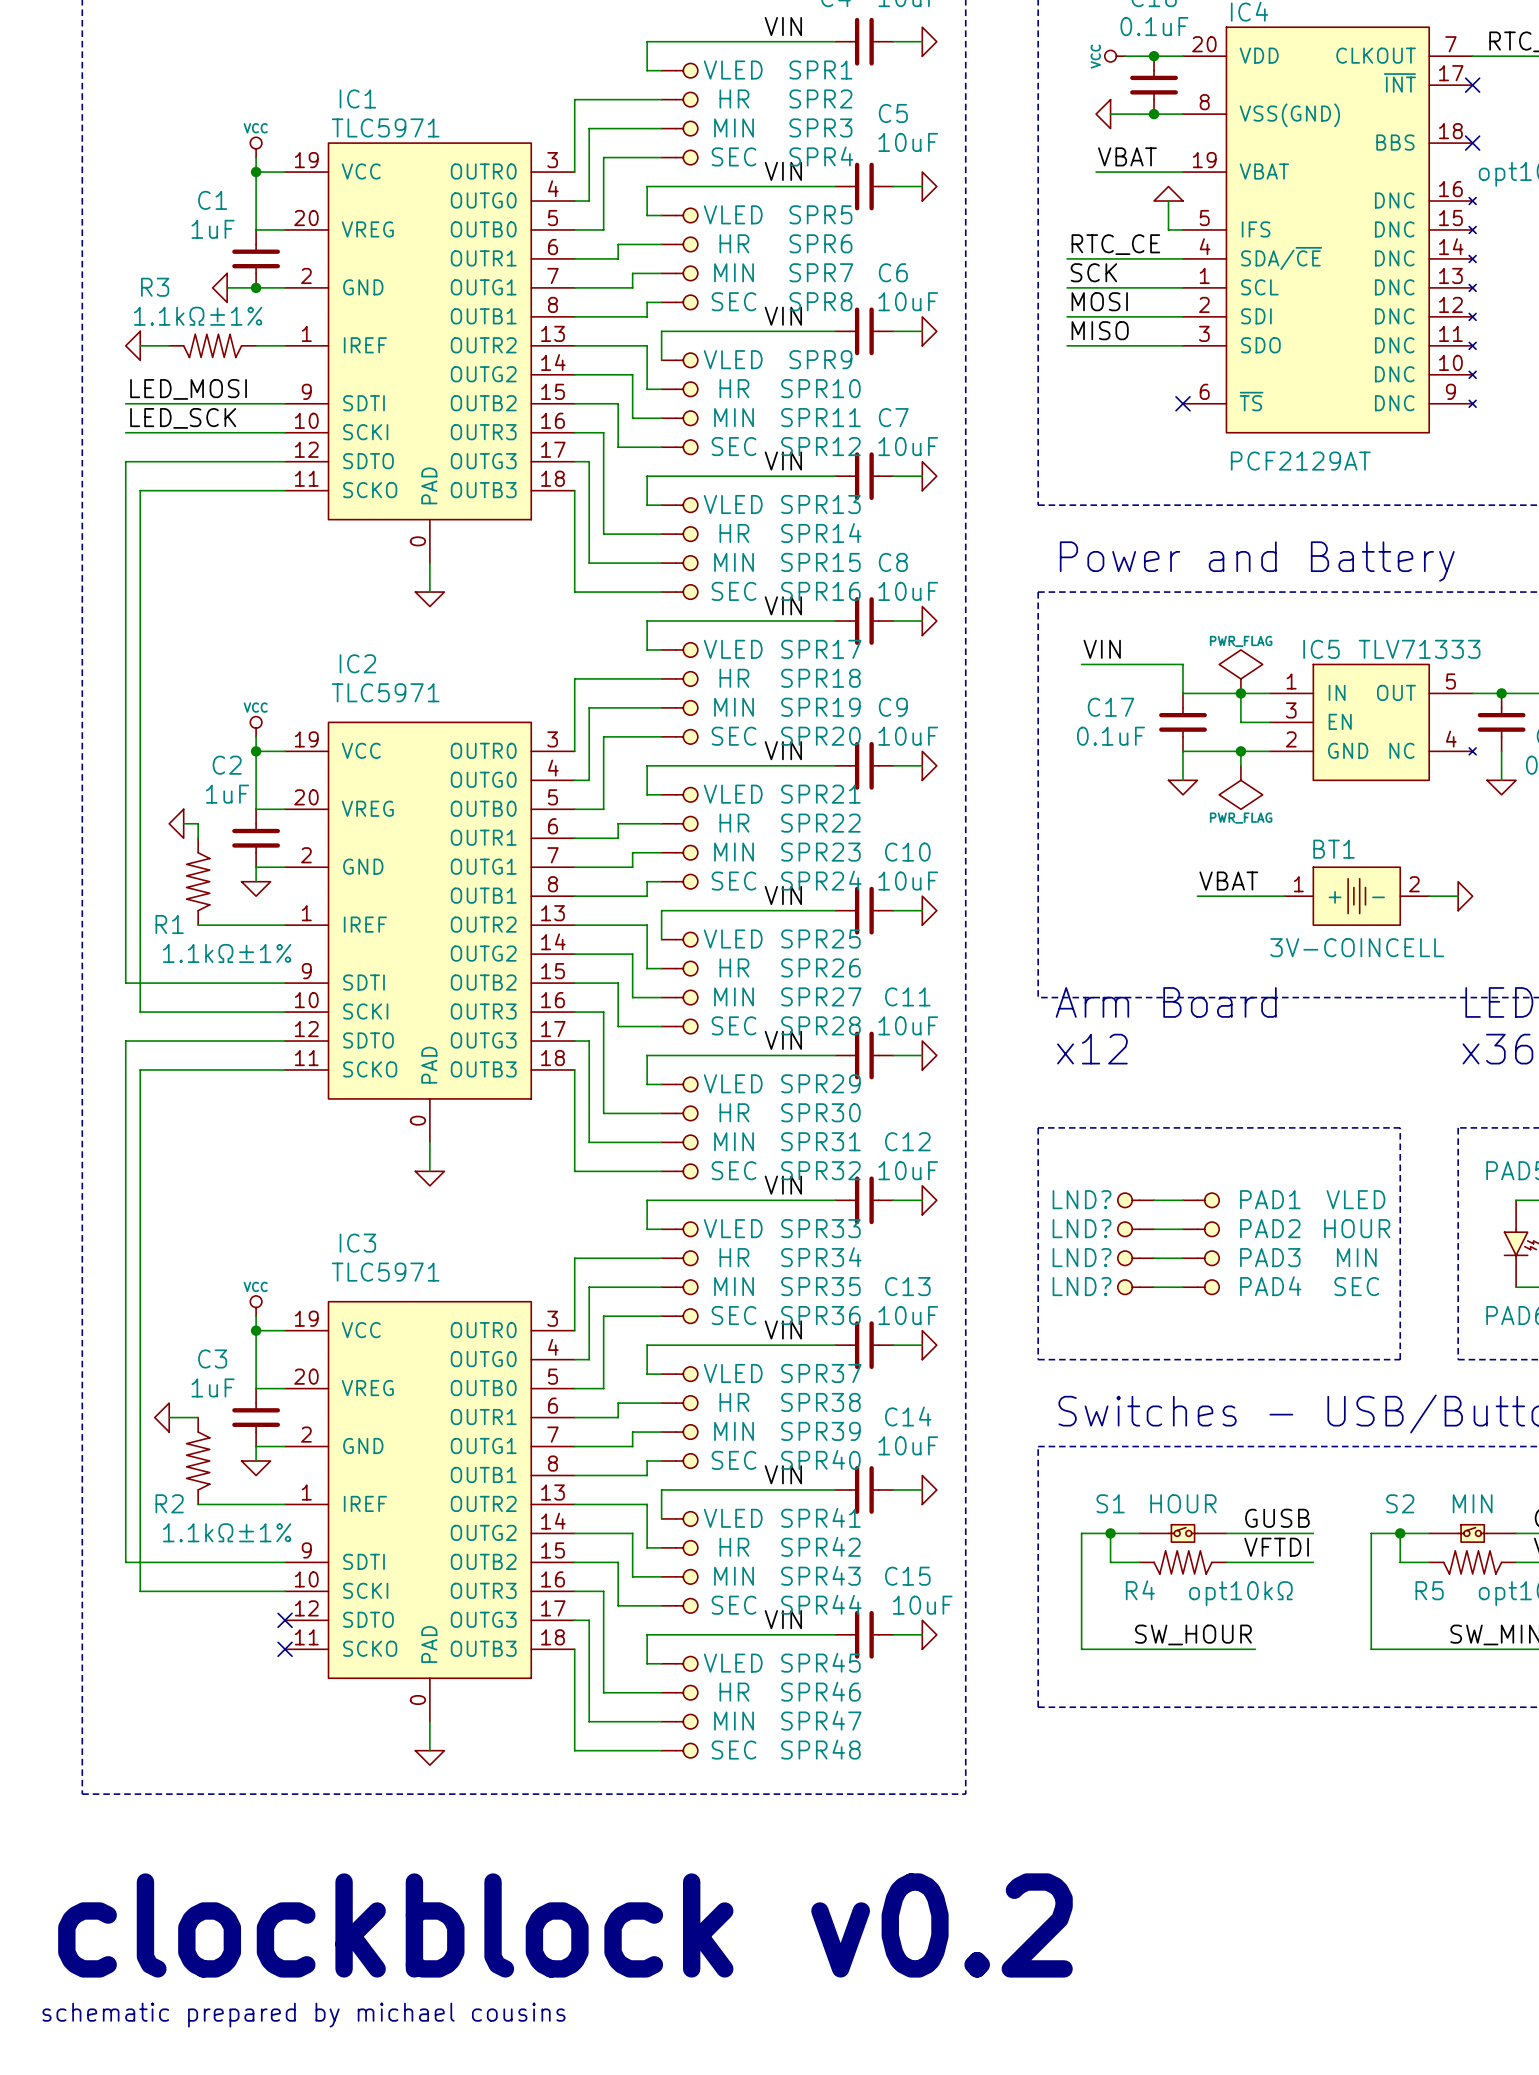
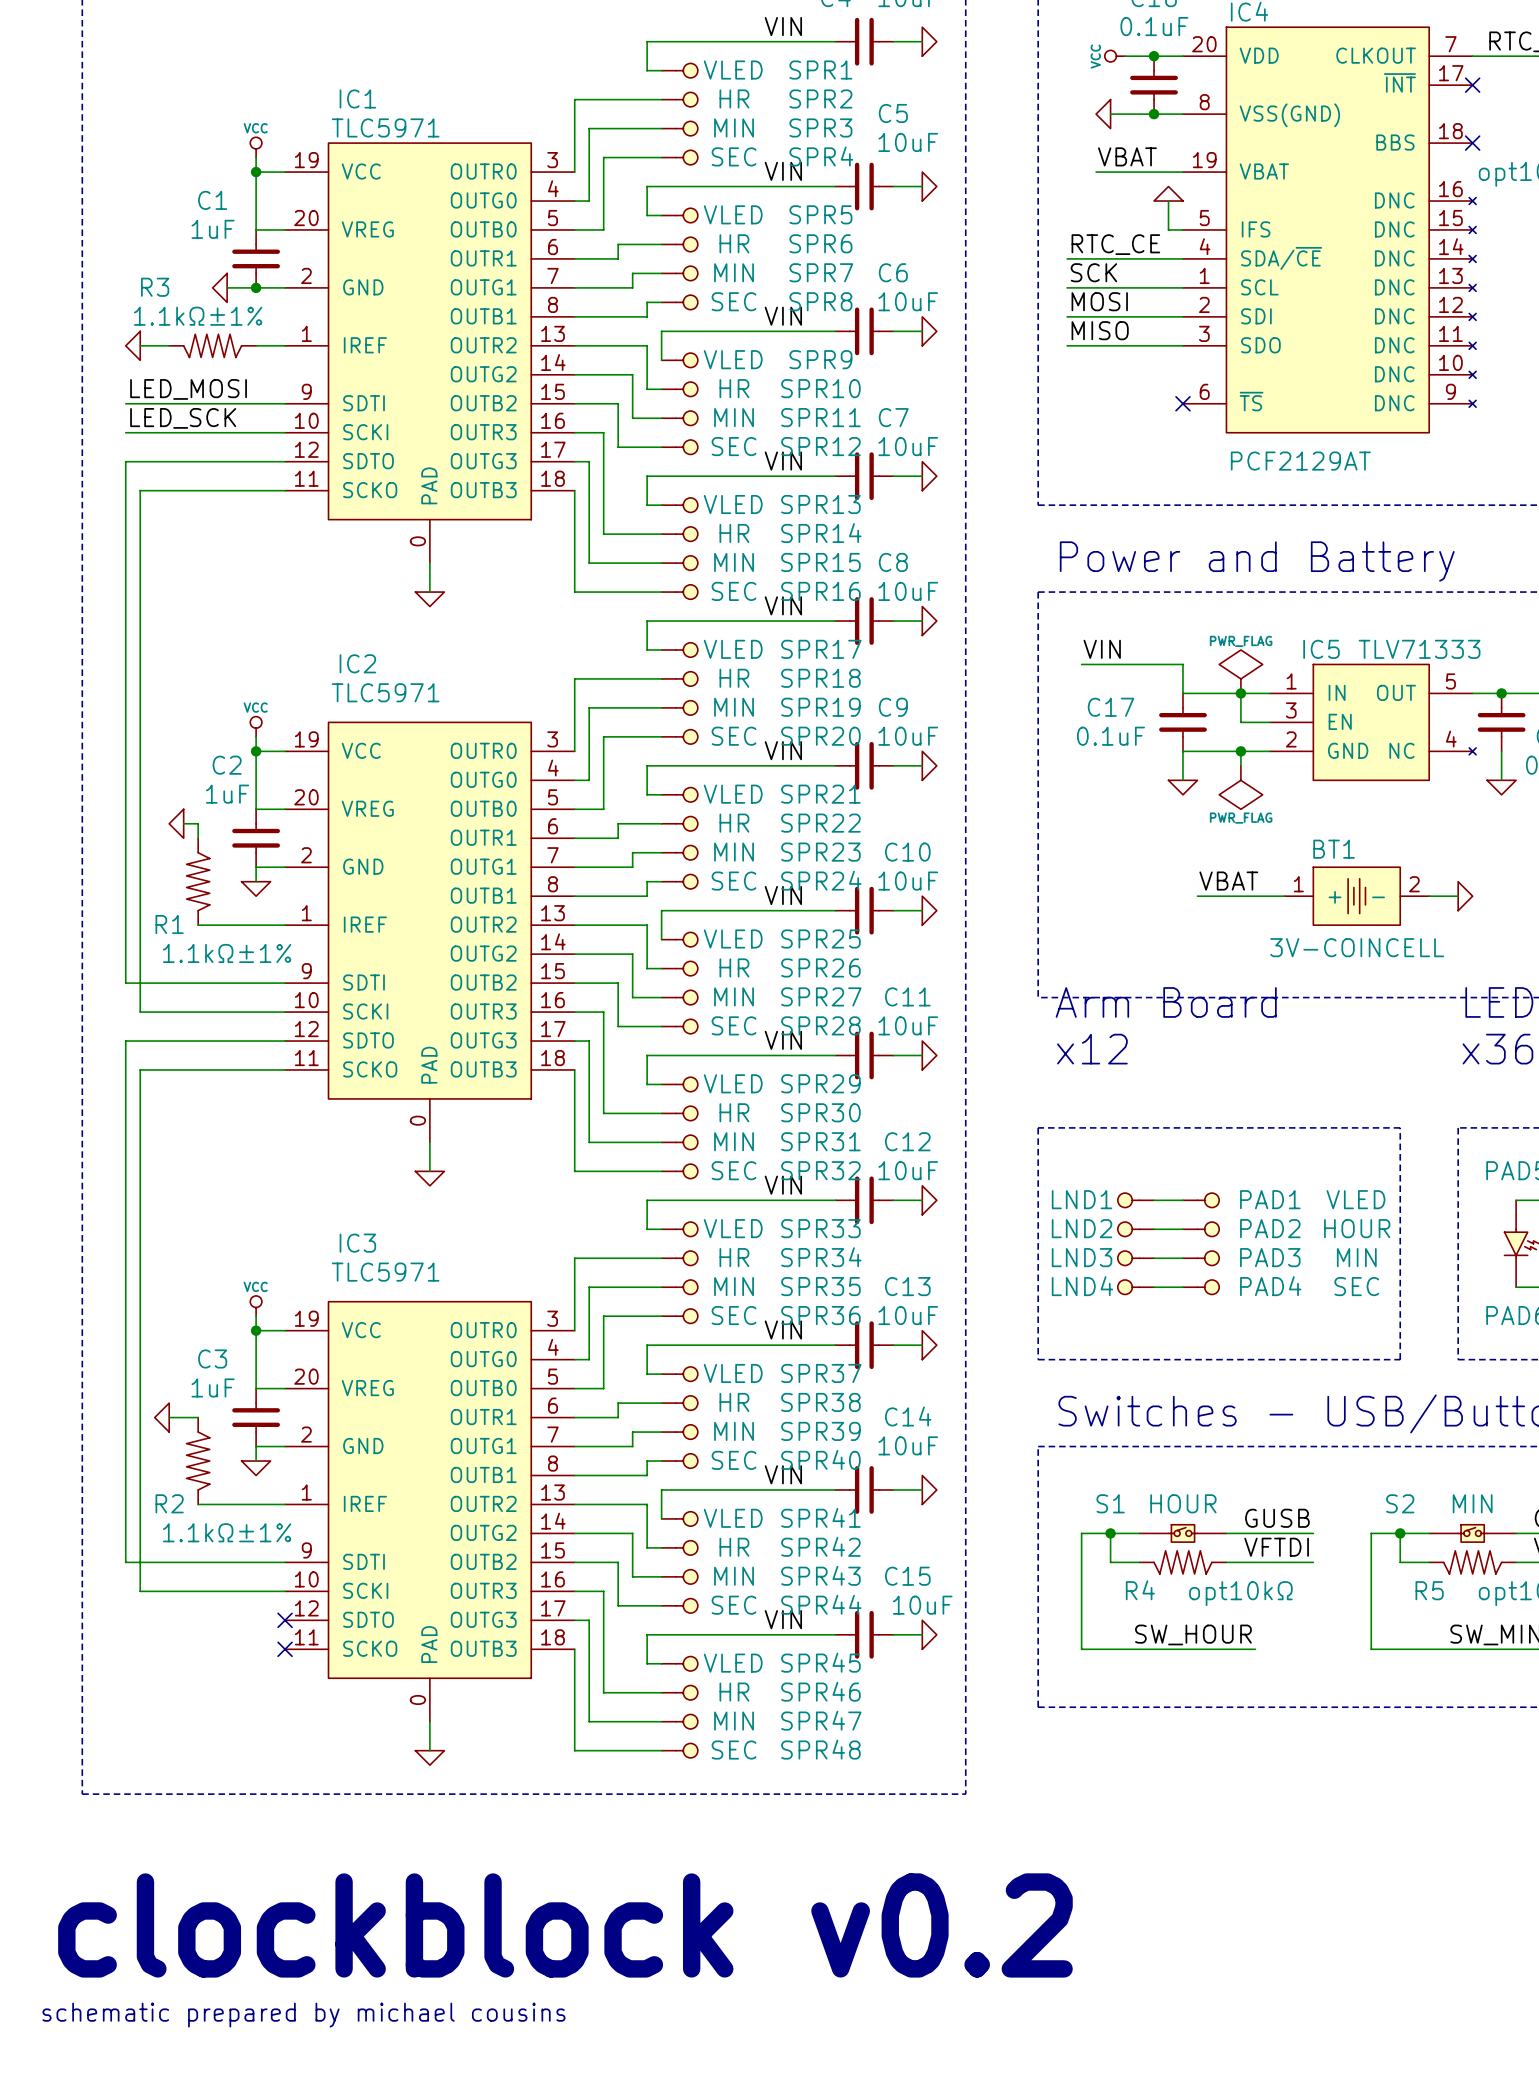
LND? name: LND? (1082, 1199) -> LND1 (1082, 1199)
LND? name: LND? (1082, 1228) -> LND2 (1082, 1228)
LND? name: LND? (1082, 1257) -> LND3 (1082, 1257)
LND? name: LND? (1082, 1286) -> LND4 (1082, 1286)

